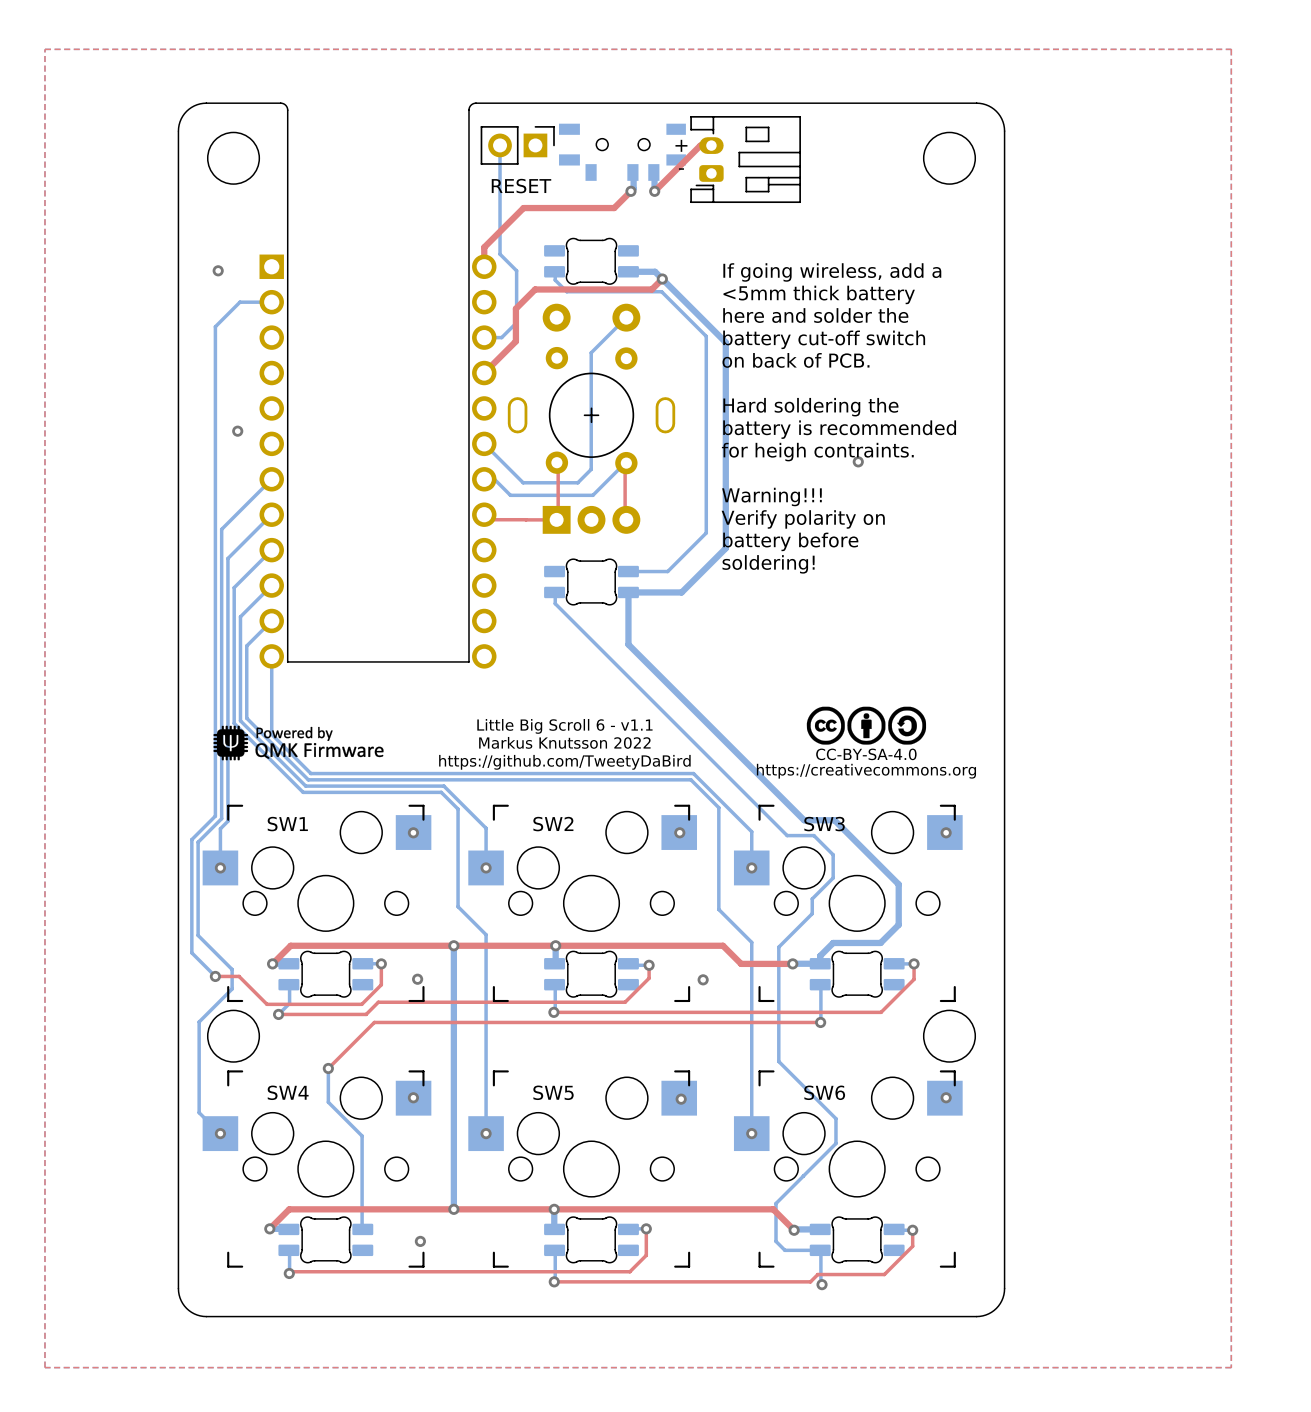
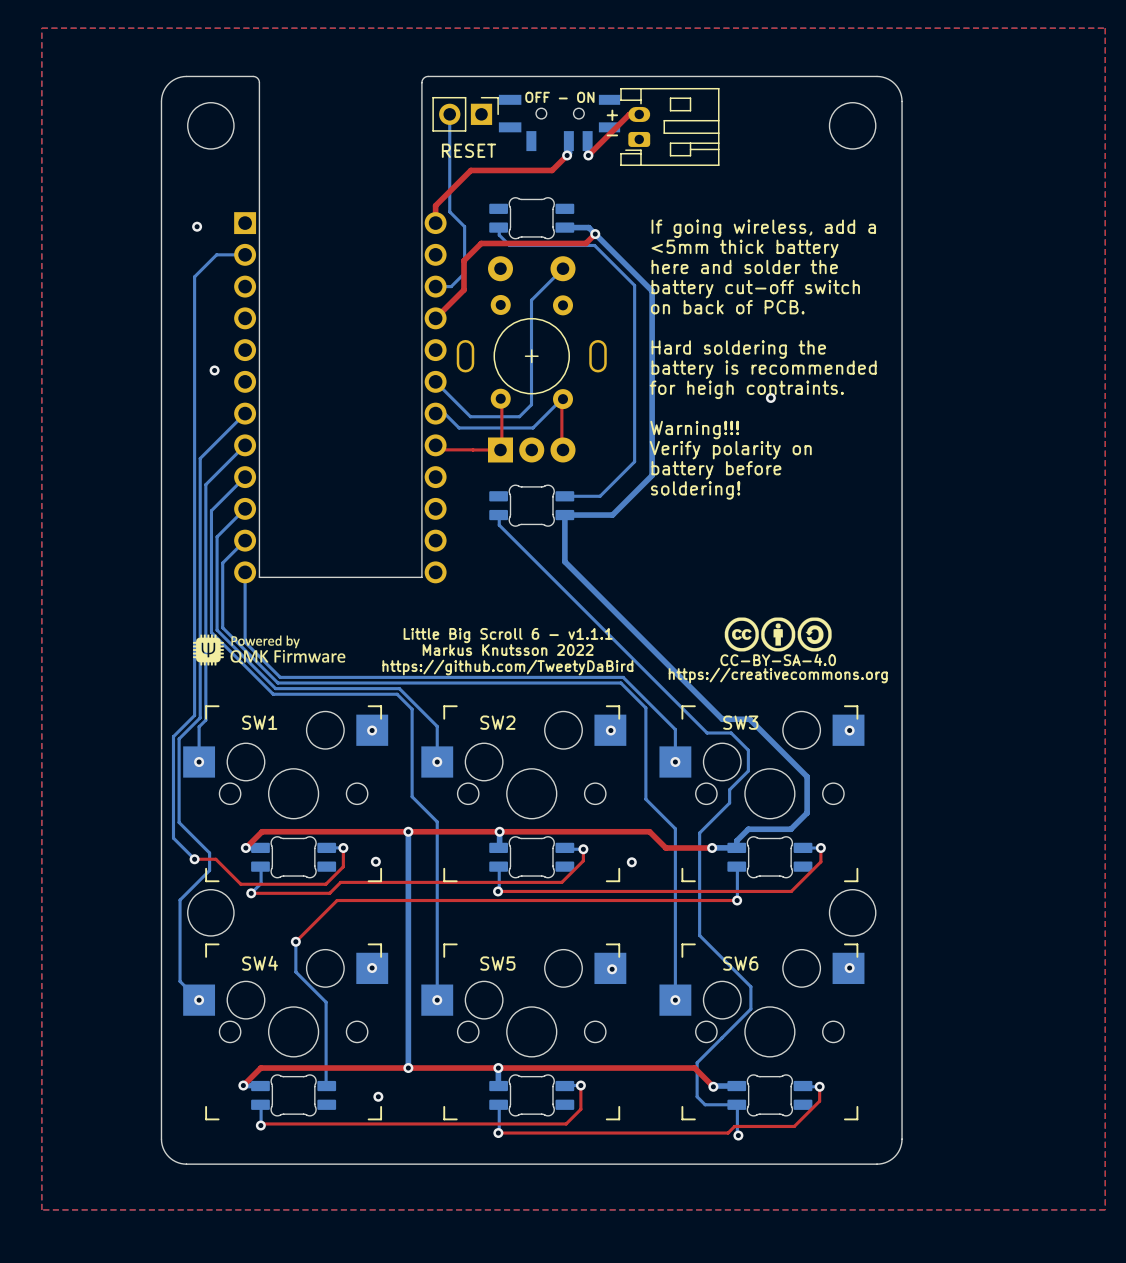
part footprint: [559, 123, 686, 181] -> [498, 94, 621, 152]
text: Little Big Scroll 6 - v1.1 (564, 726) -> Little Big Scroll 6 - v1.1.1 (508, 635)

